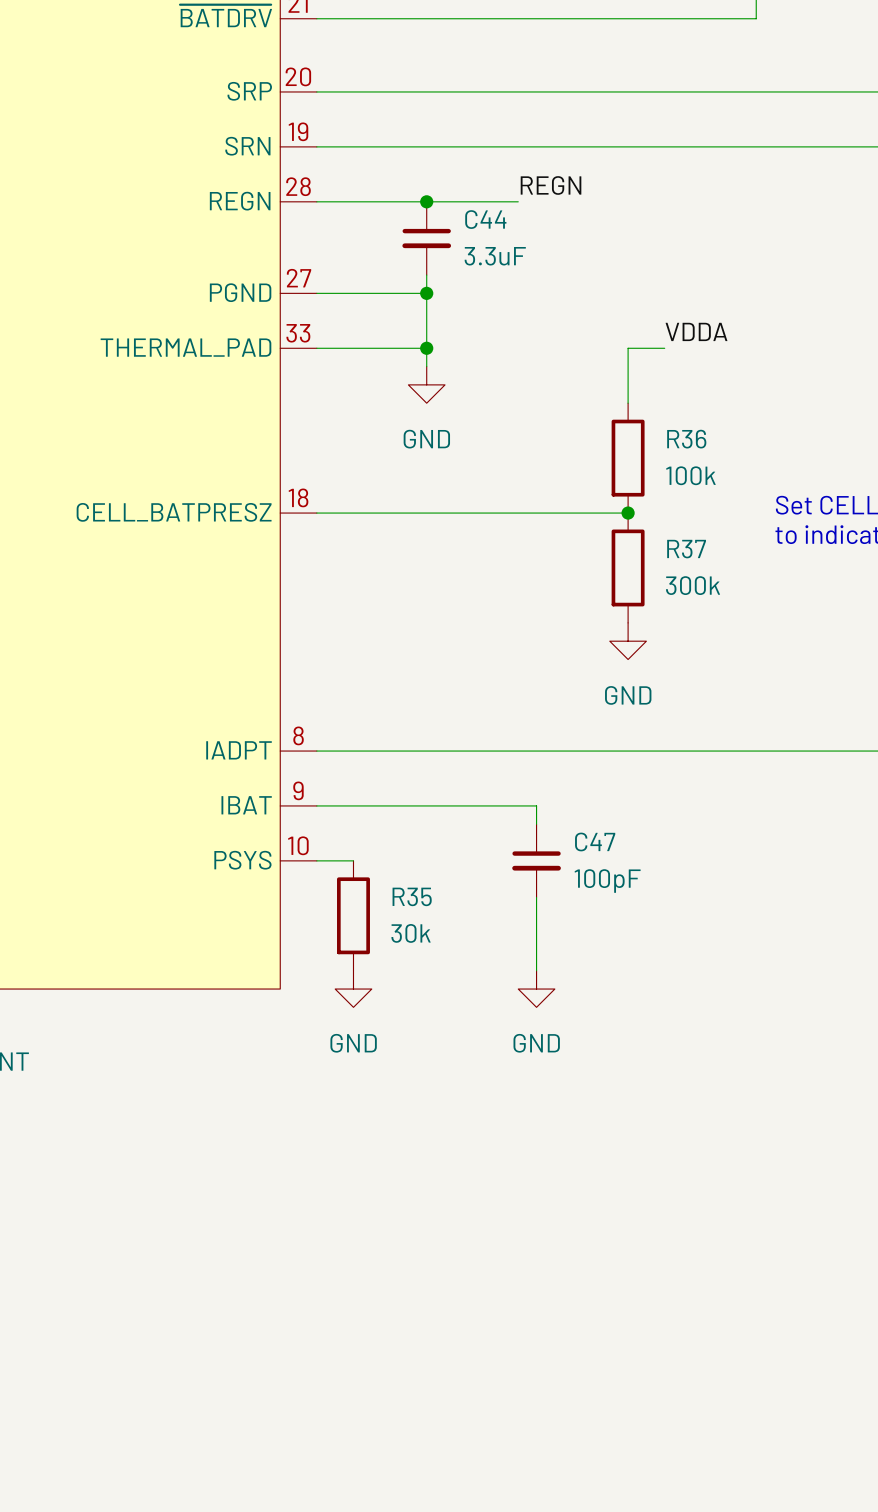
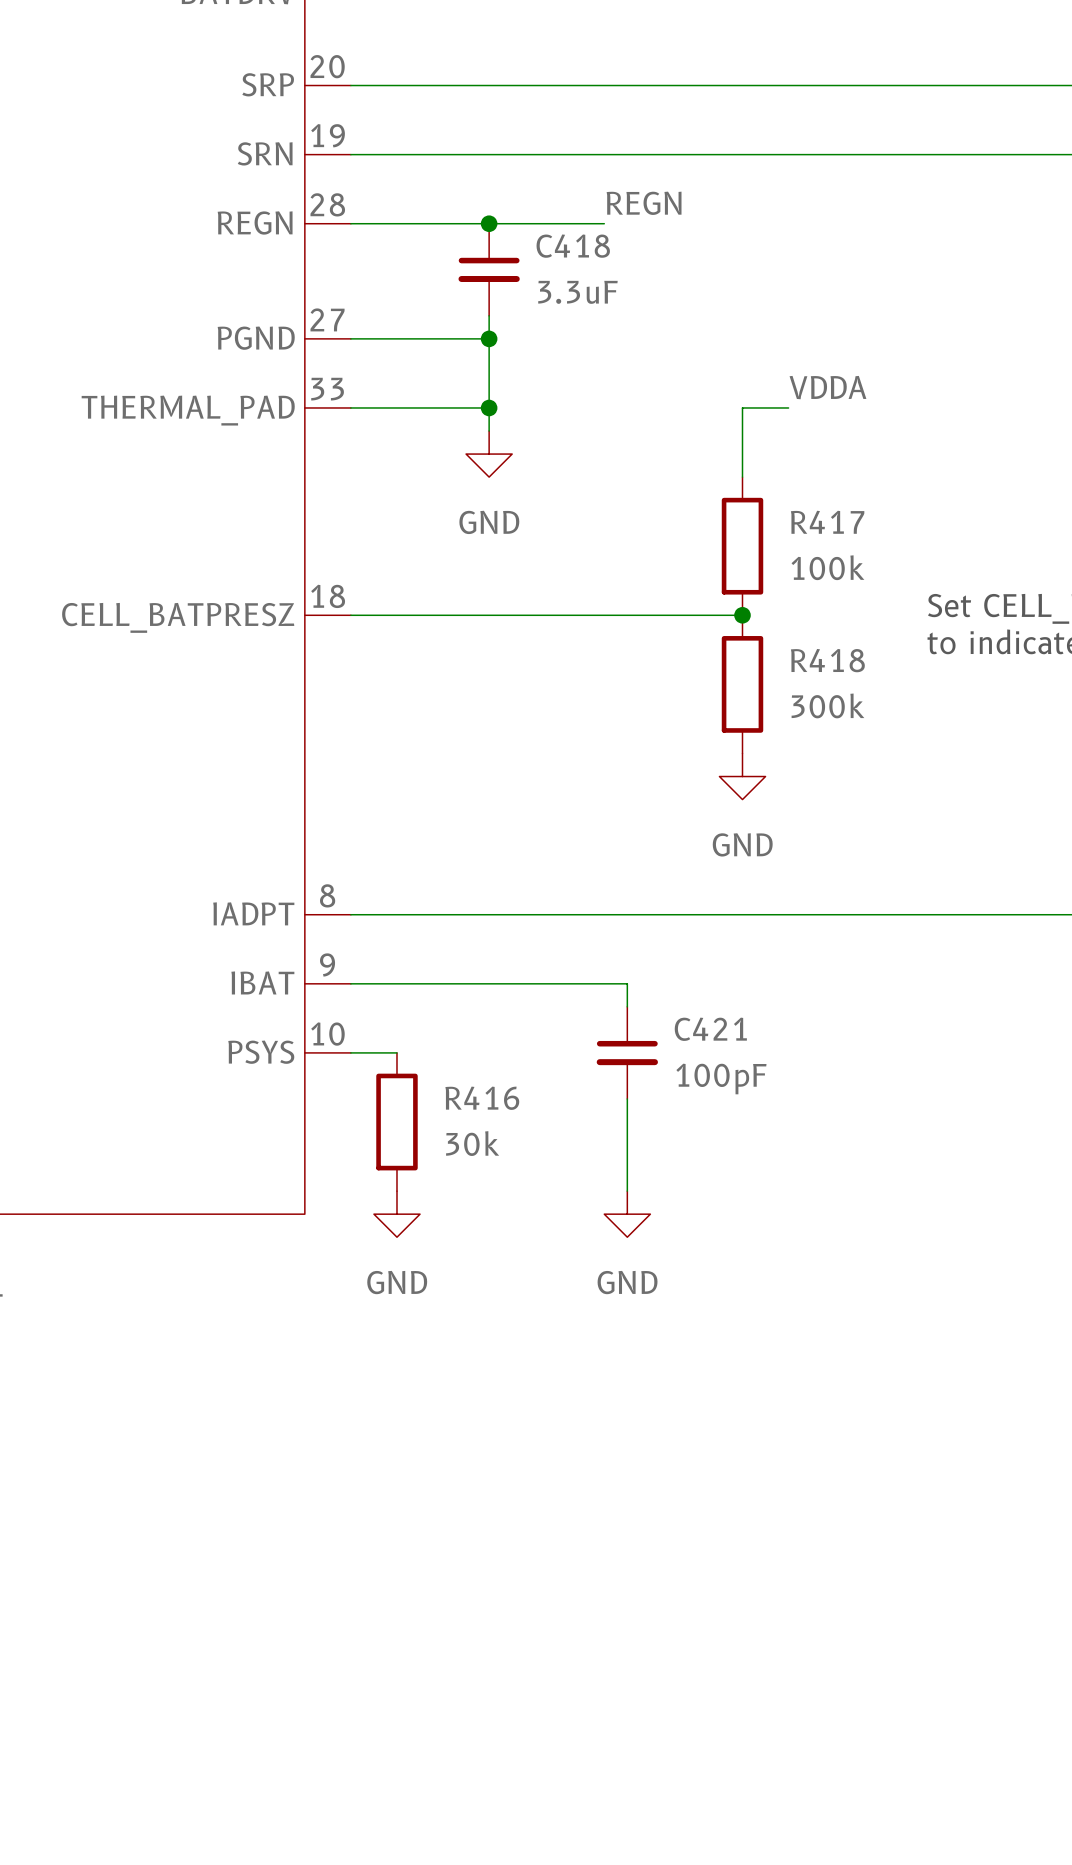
C44 name: C44 (485, 219) -> C418 (573, 246)
R36 name: R36 (686, 439) -> R417 (827, 522)
R37 name: R37 (686, 549) -> R418 (827, 660)
C47 name: C47 (595, 841) -> C421 (710, 1029)
R35 name: R35 (412, 896) -> R416 (482, 1098)

